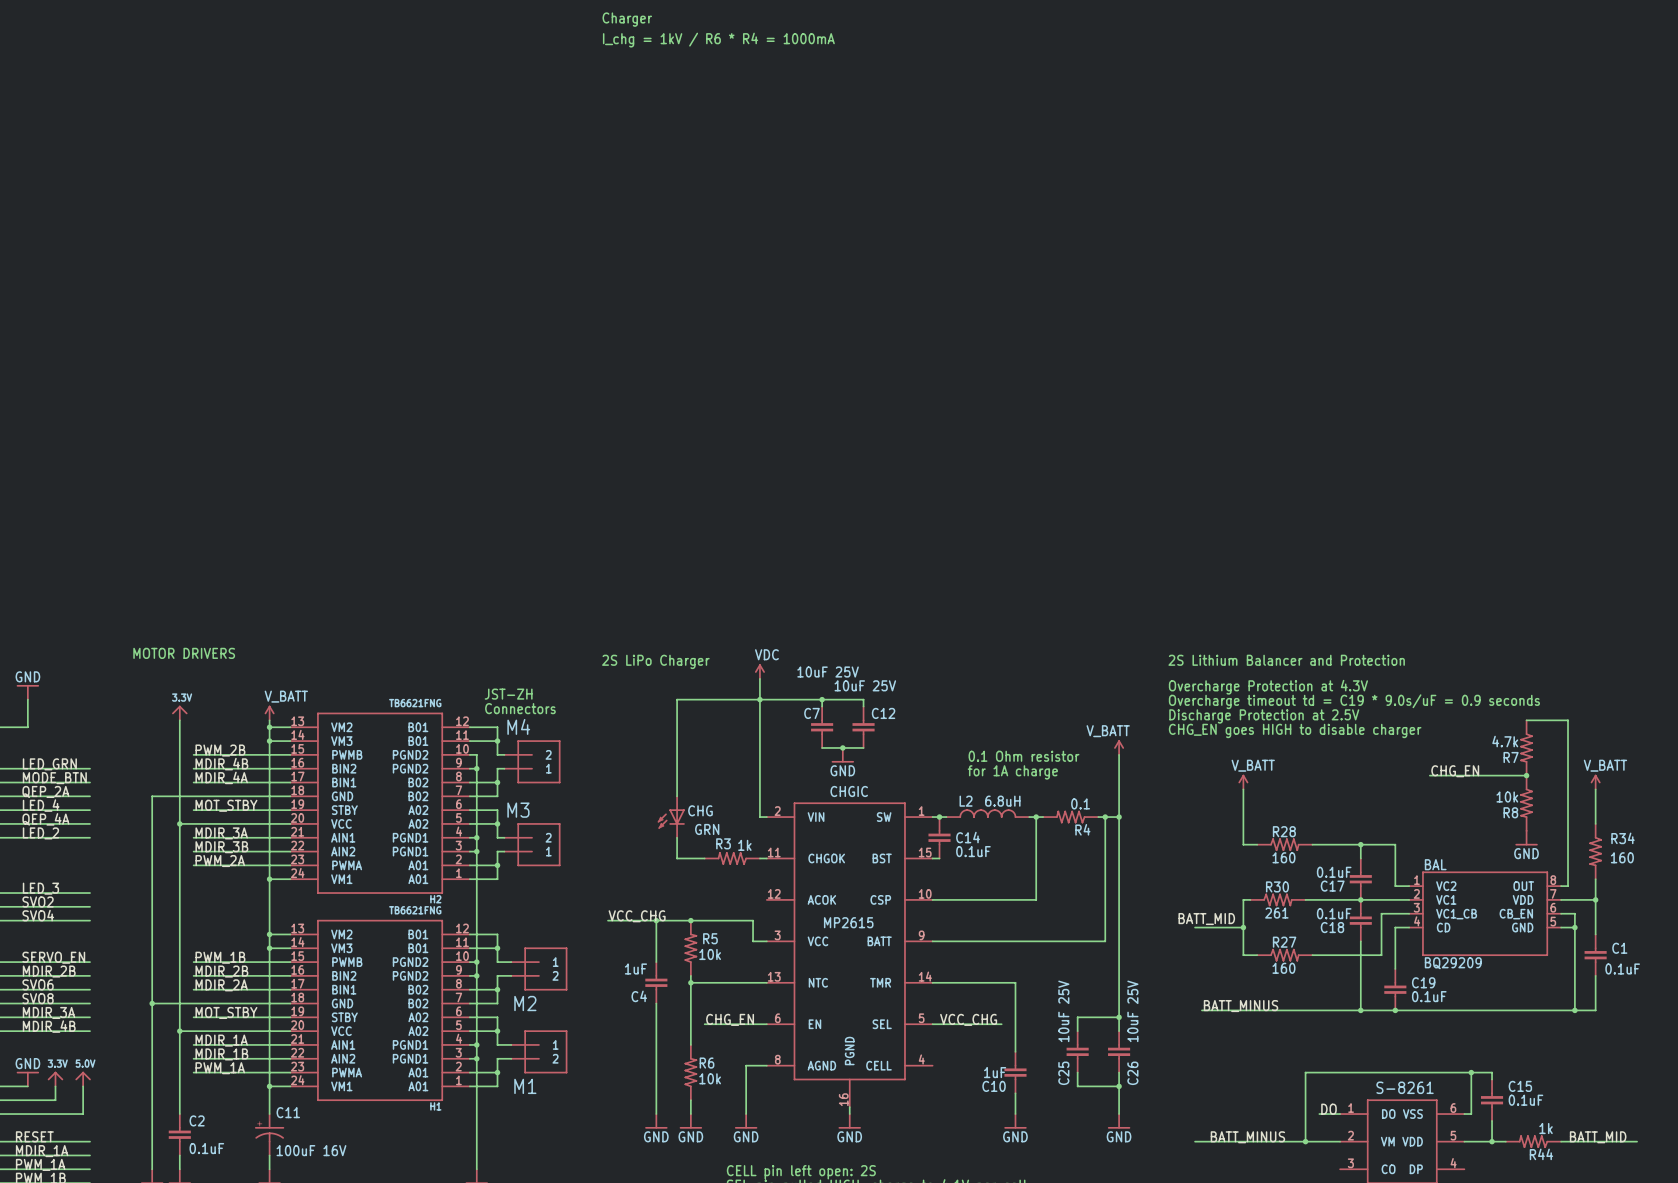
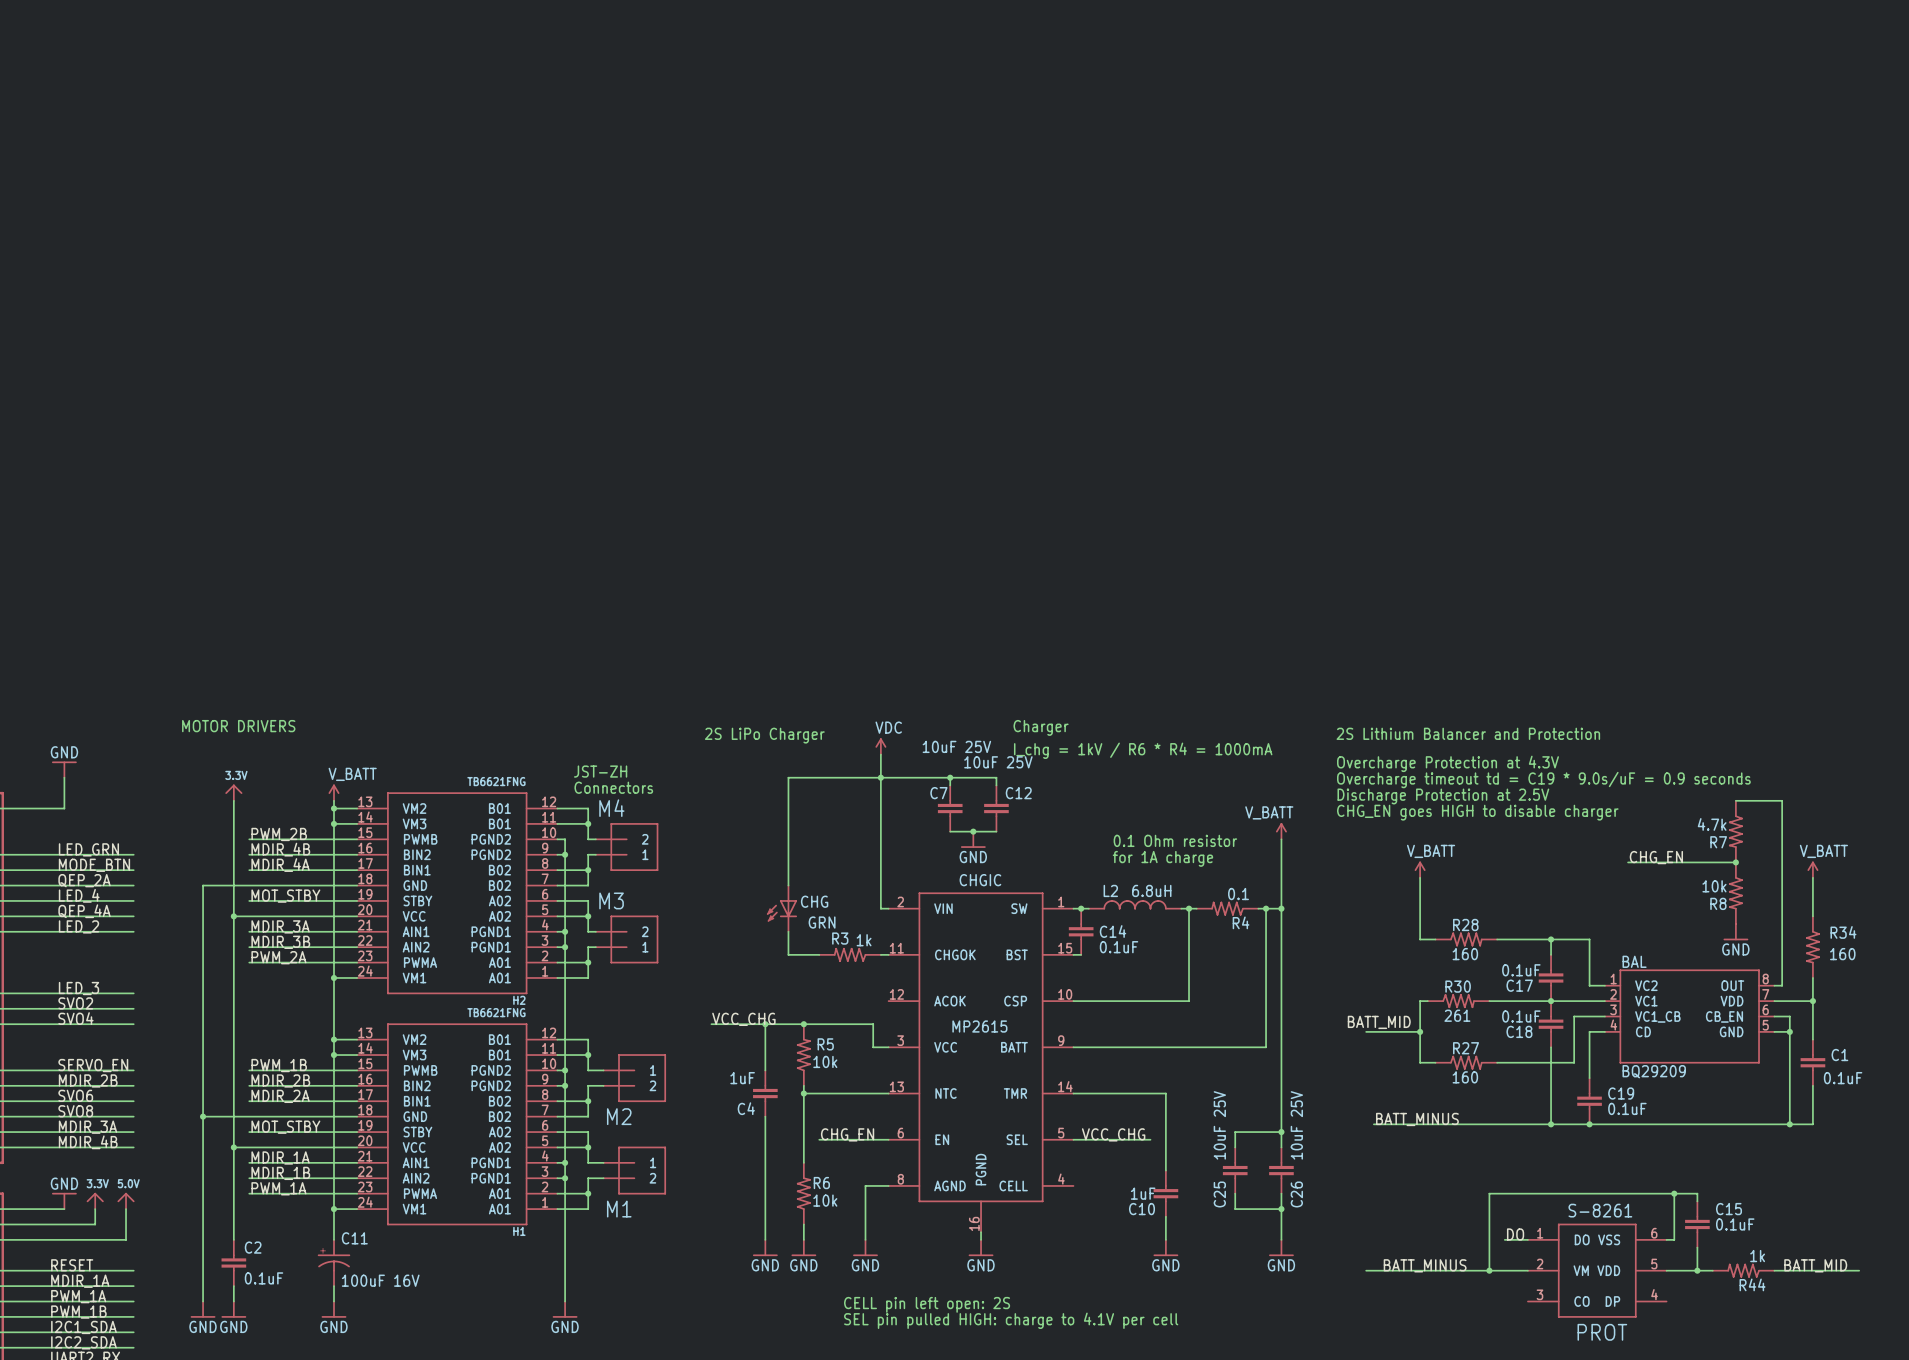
text: Charger (627, 19) -> none
text: I_chg = 1kV / R6 * R4 = 1000mA (718, 40) -> none
text: none -> Charger (1041, 727)
text: none -> I_chg = 1kV / R6 * R4 = 1000mA (1143, 750)

